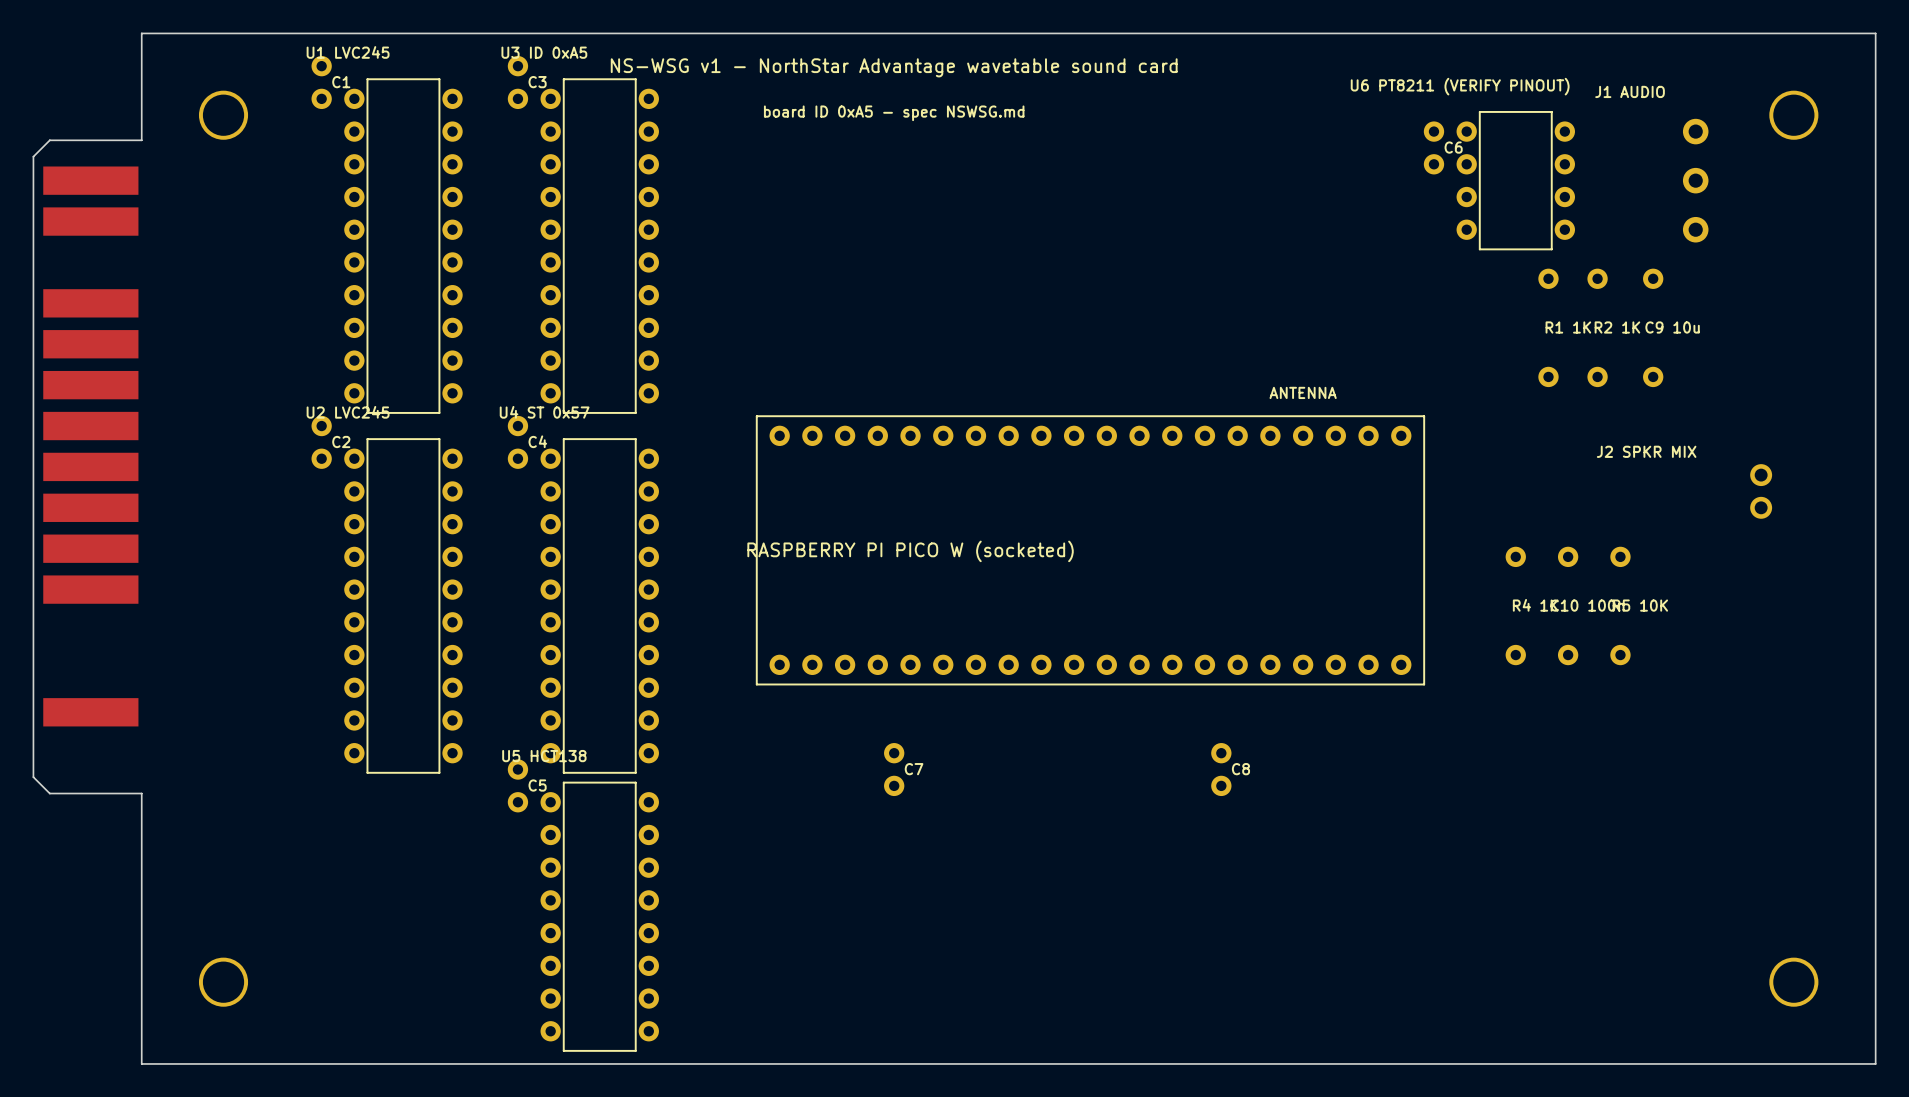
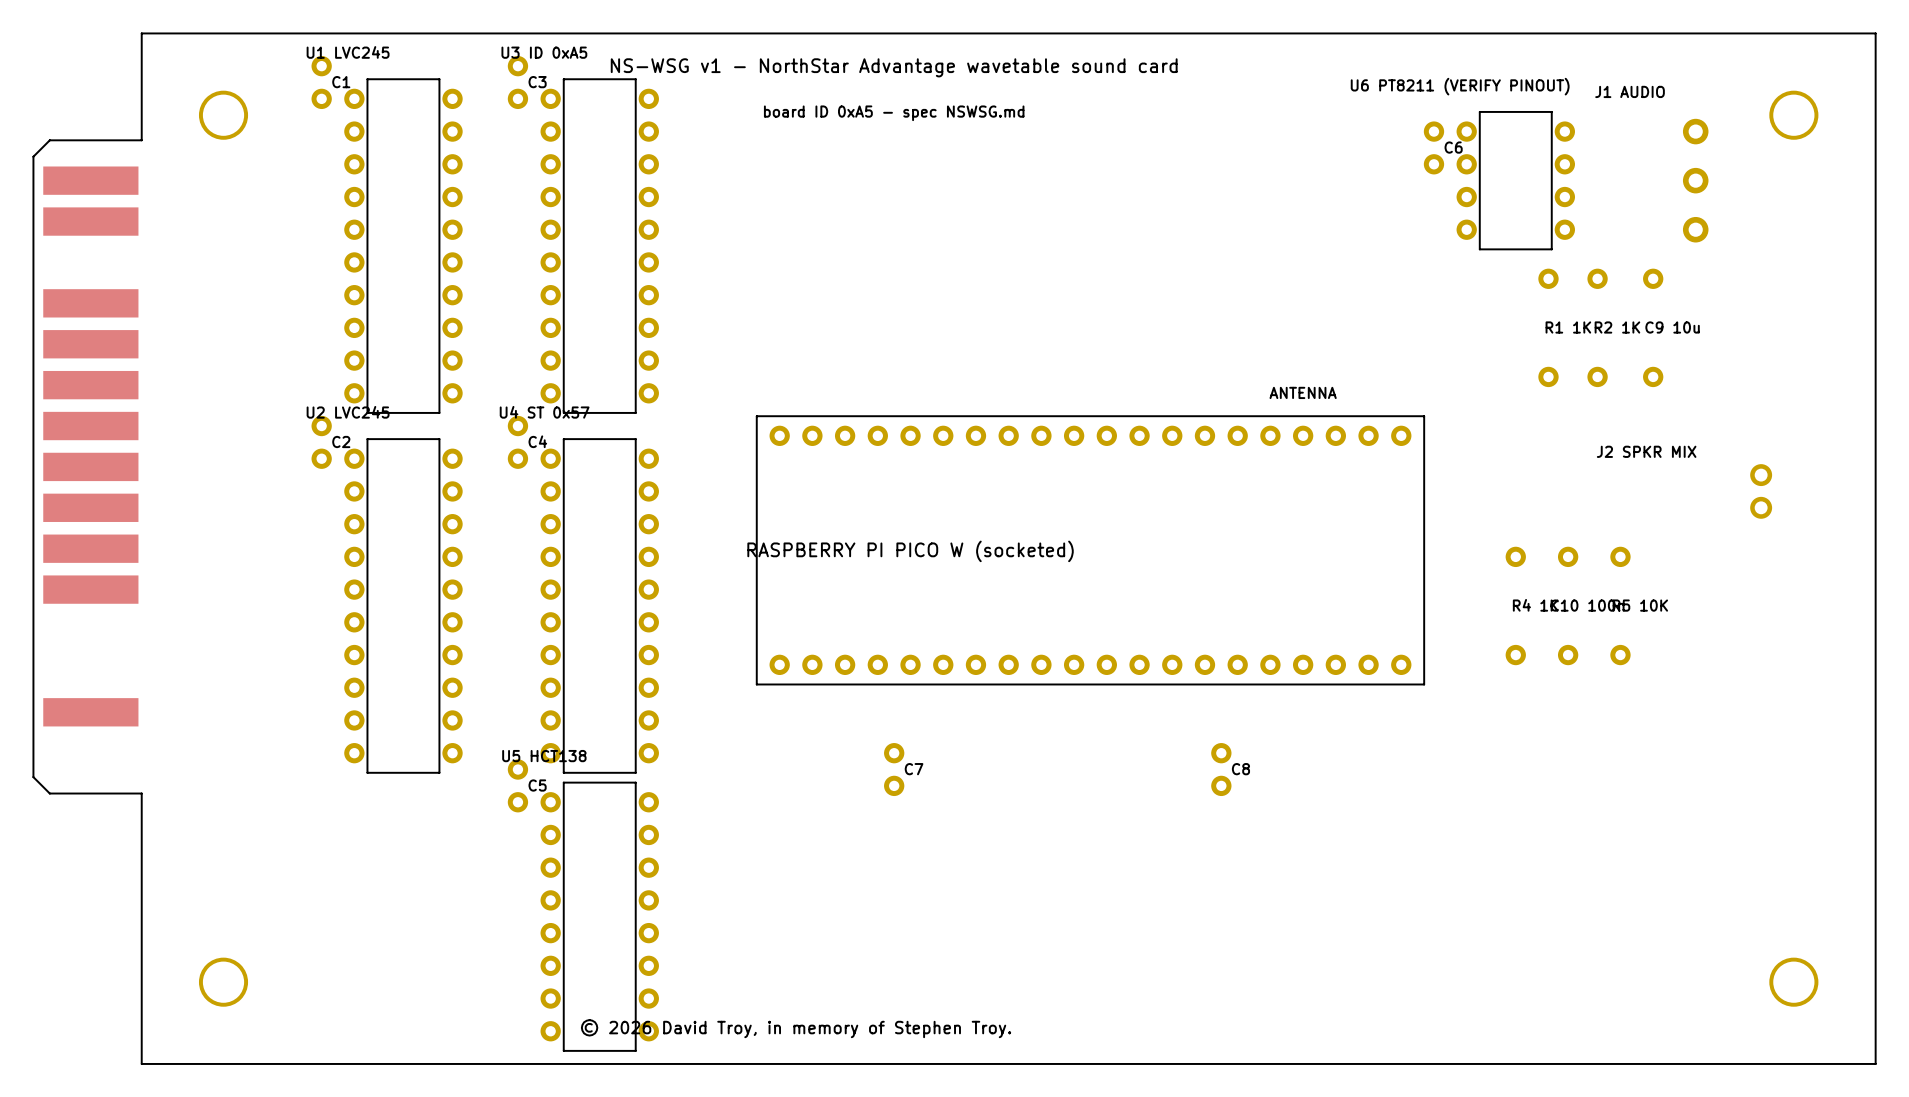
text: none -> © 2026 David Troy, in memory of Stephen Troy. (796, 1028)

